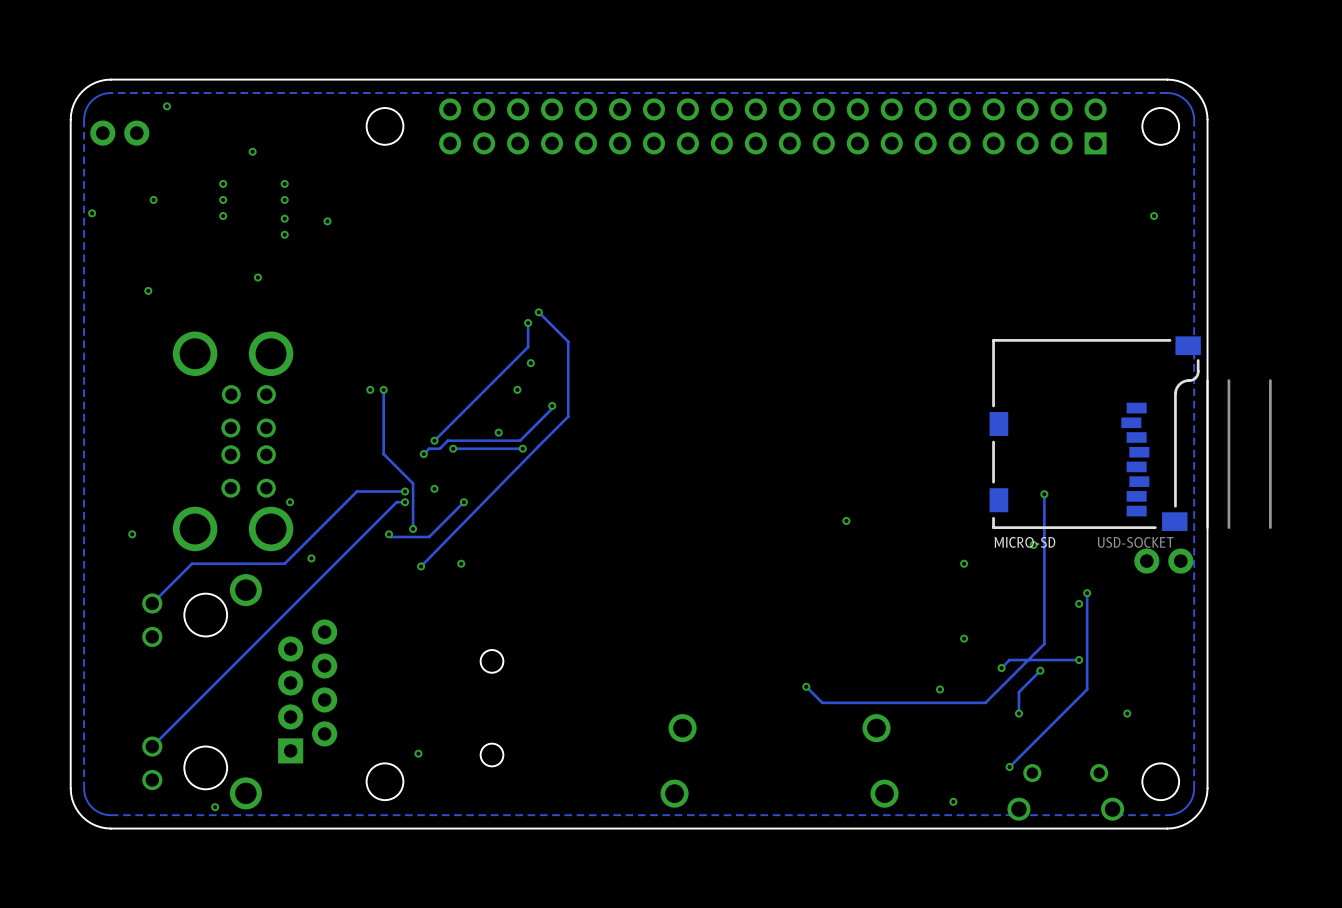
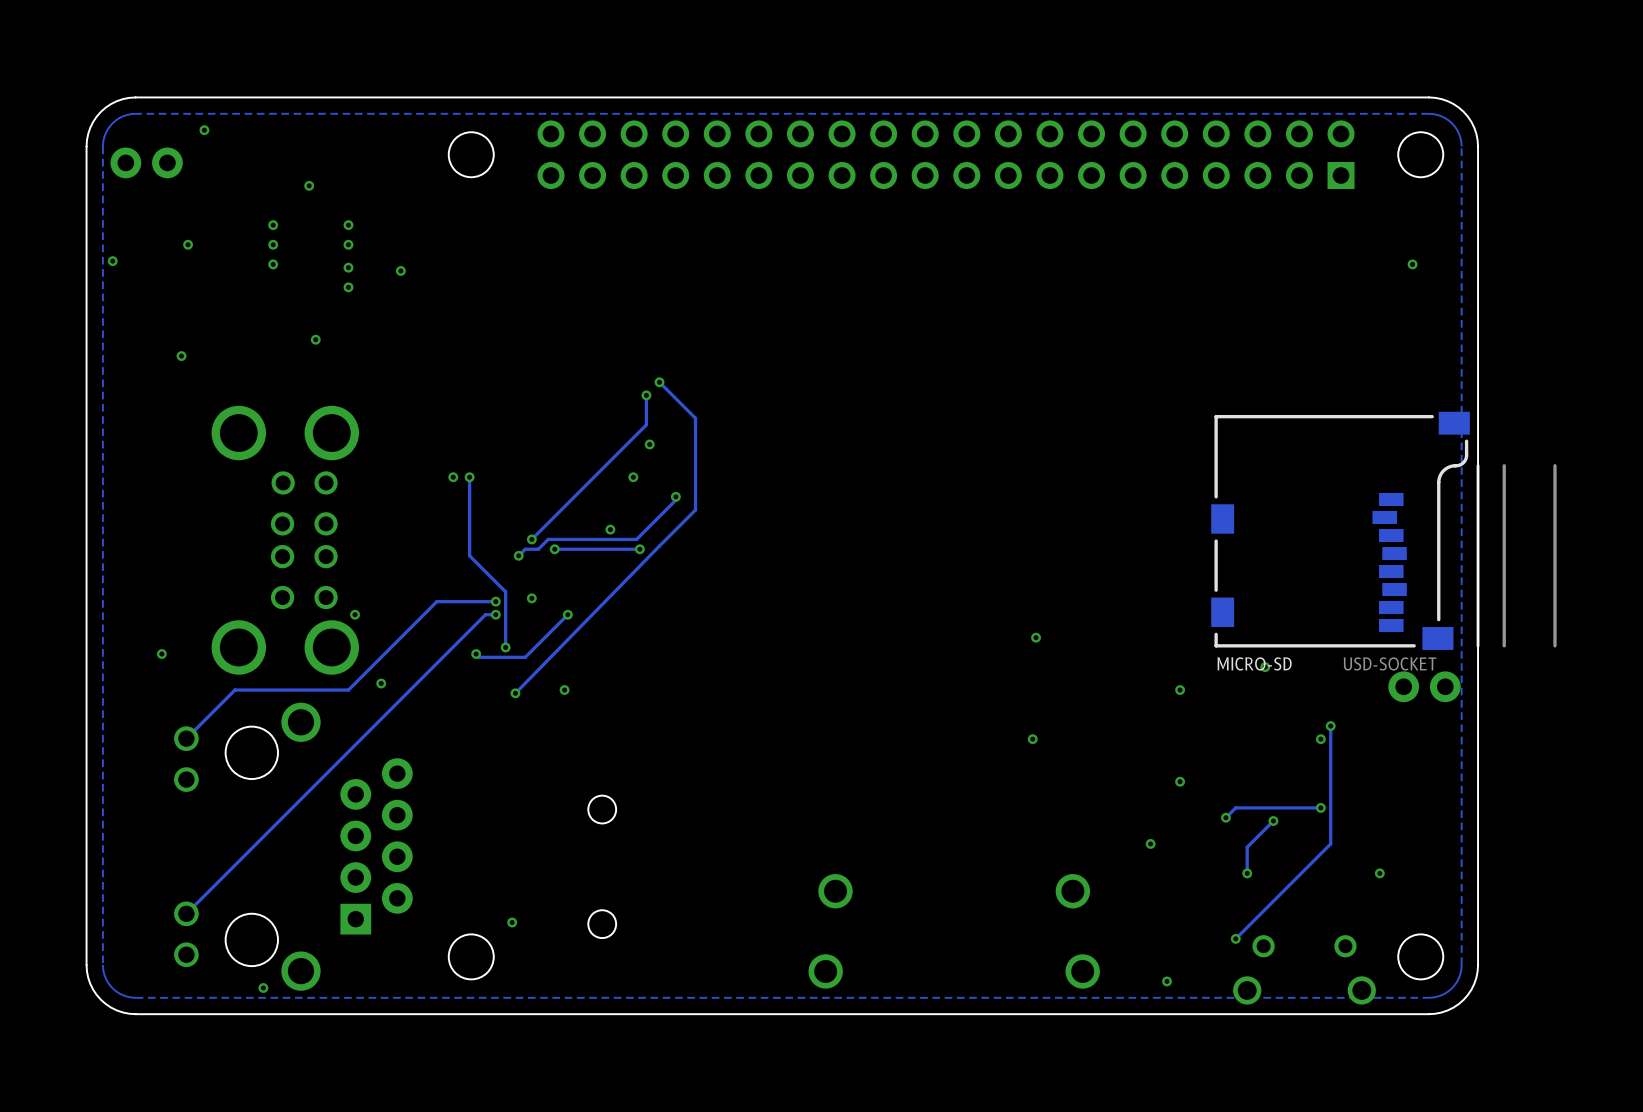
track: (1044, 494) (1044, 644) (985, 702) (822, 702) (806, 686) -> none
via: (1044, 494) -> none
via: none -> (1032, 739)
via: (806, 686) -> none

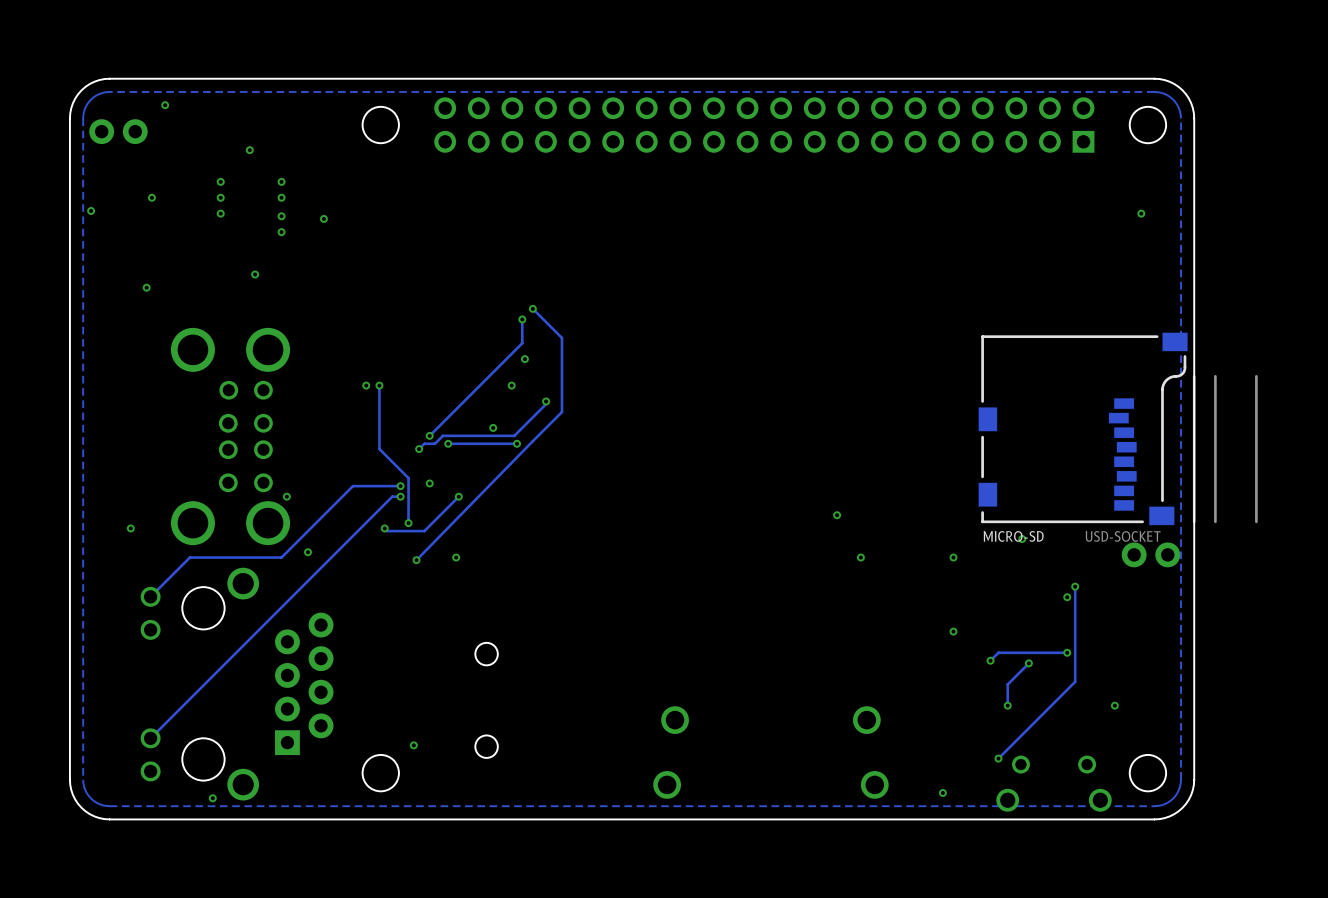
via position: (1032, 739) -> (860, 557)
via: (1150, 843) -> none

